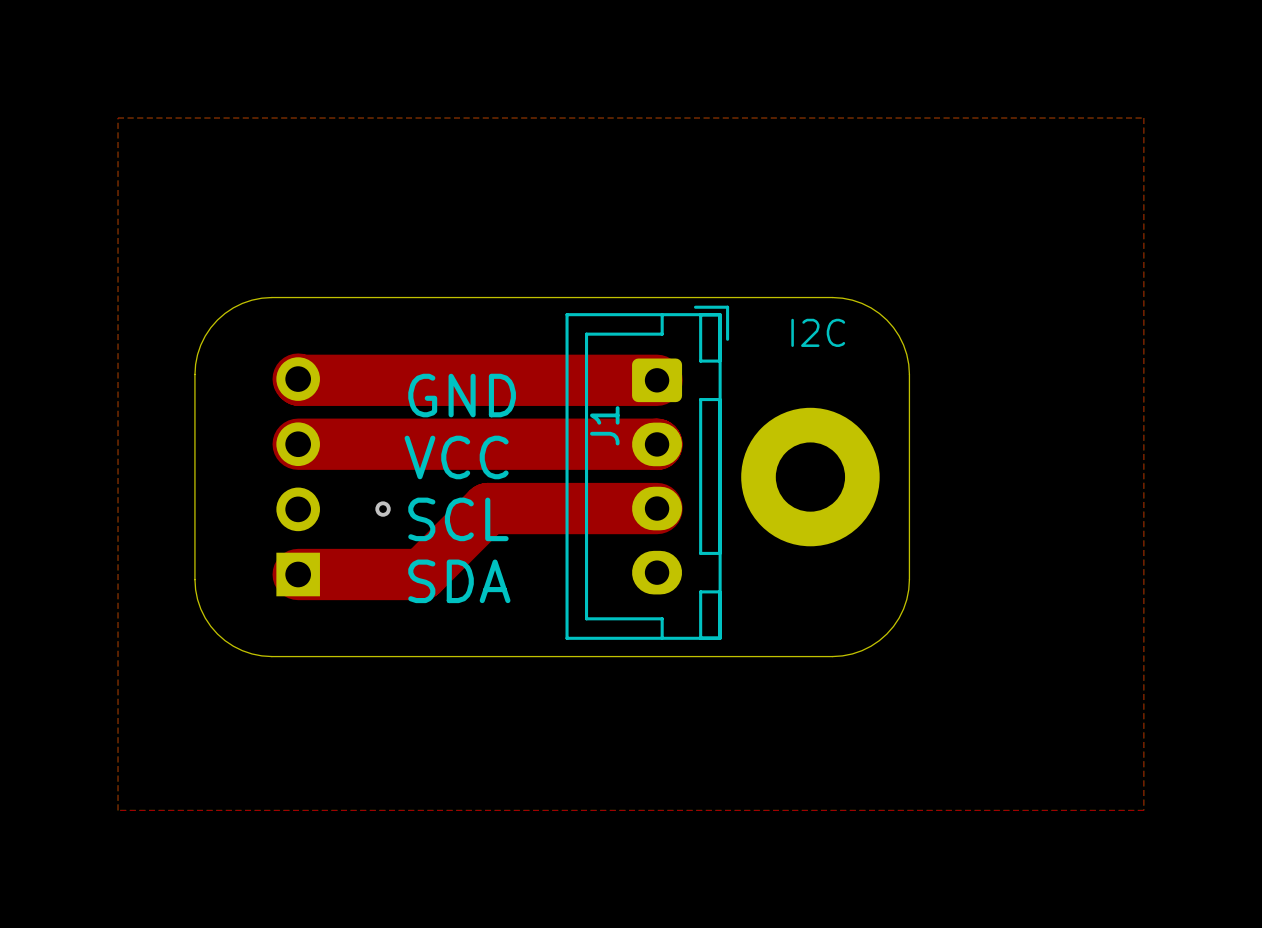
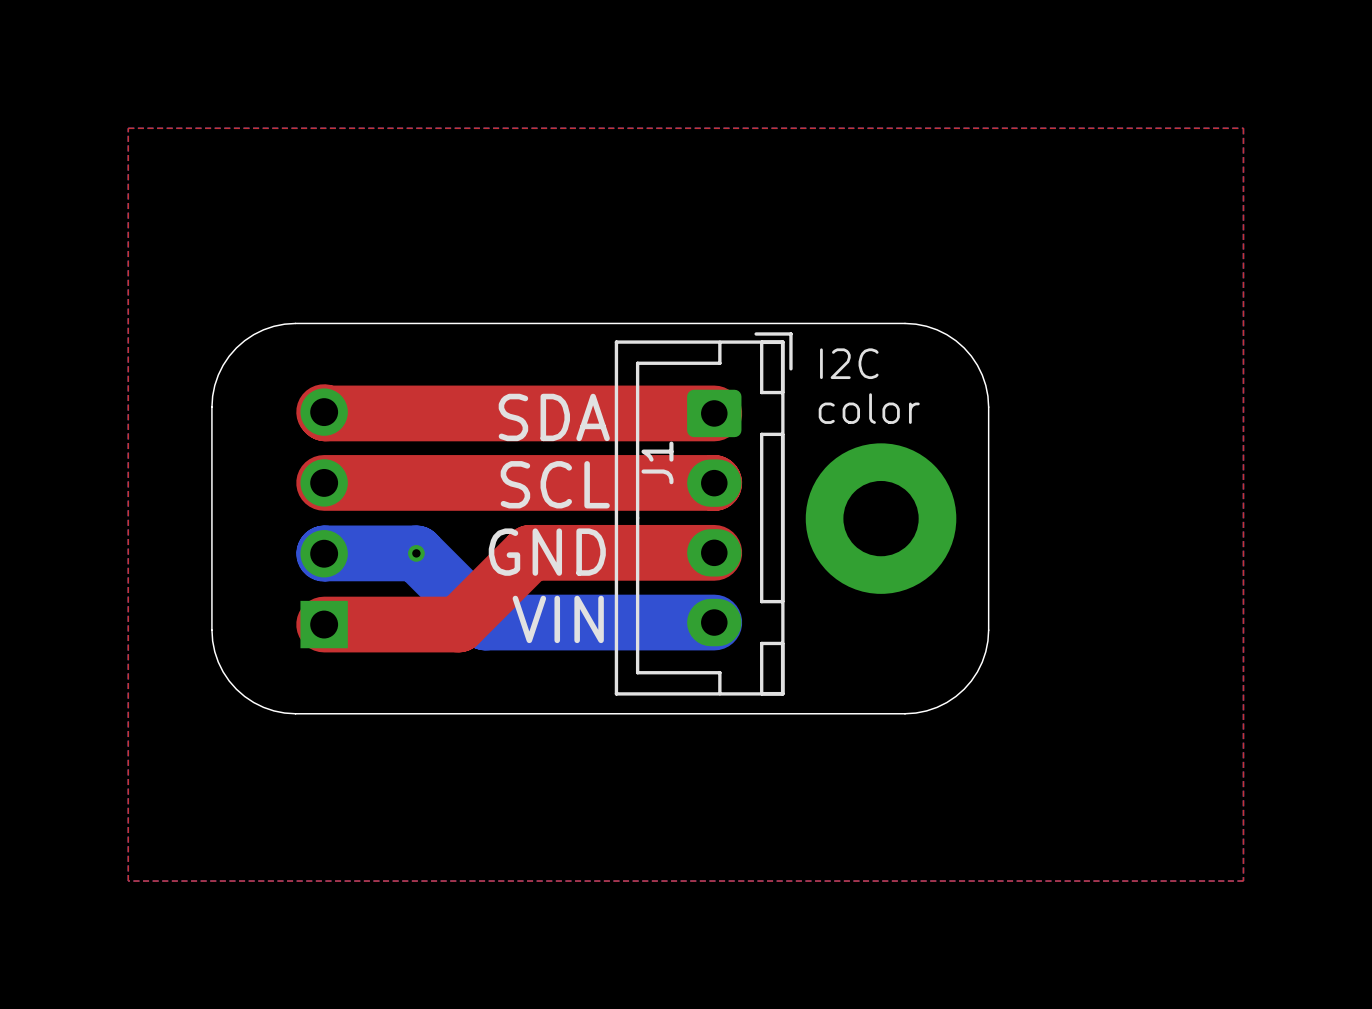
text position: I2C (818, 332) -> I2C (849, 363)
text: none -> color (869, 408)
text position: GND (462, 395) -> GND (547, 552)
text: VCC (456, 457) -> none
bottom track: none -> (324, 553) (416, 553) (485, 622) (714, 622)
text position: SCL (458, 519) -> SCL (555, 484)
text: none -> VIN (558, 619)
text position: SDA (459, 581) -> SDA (554, 417)

